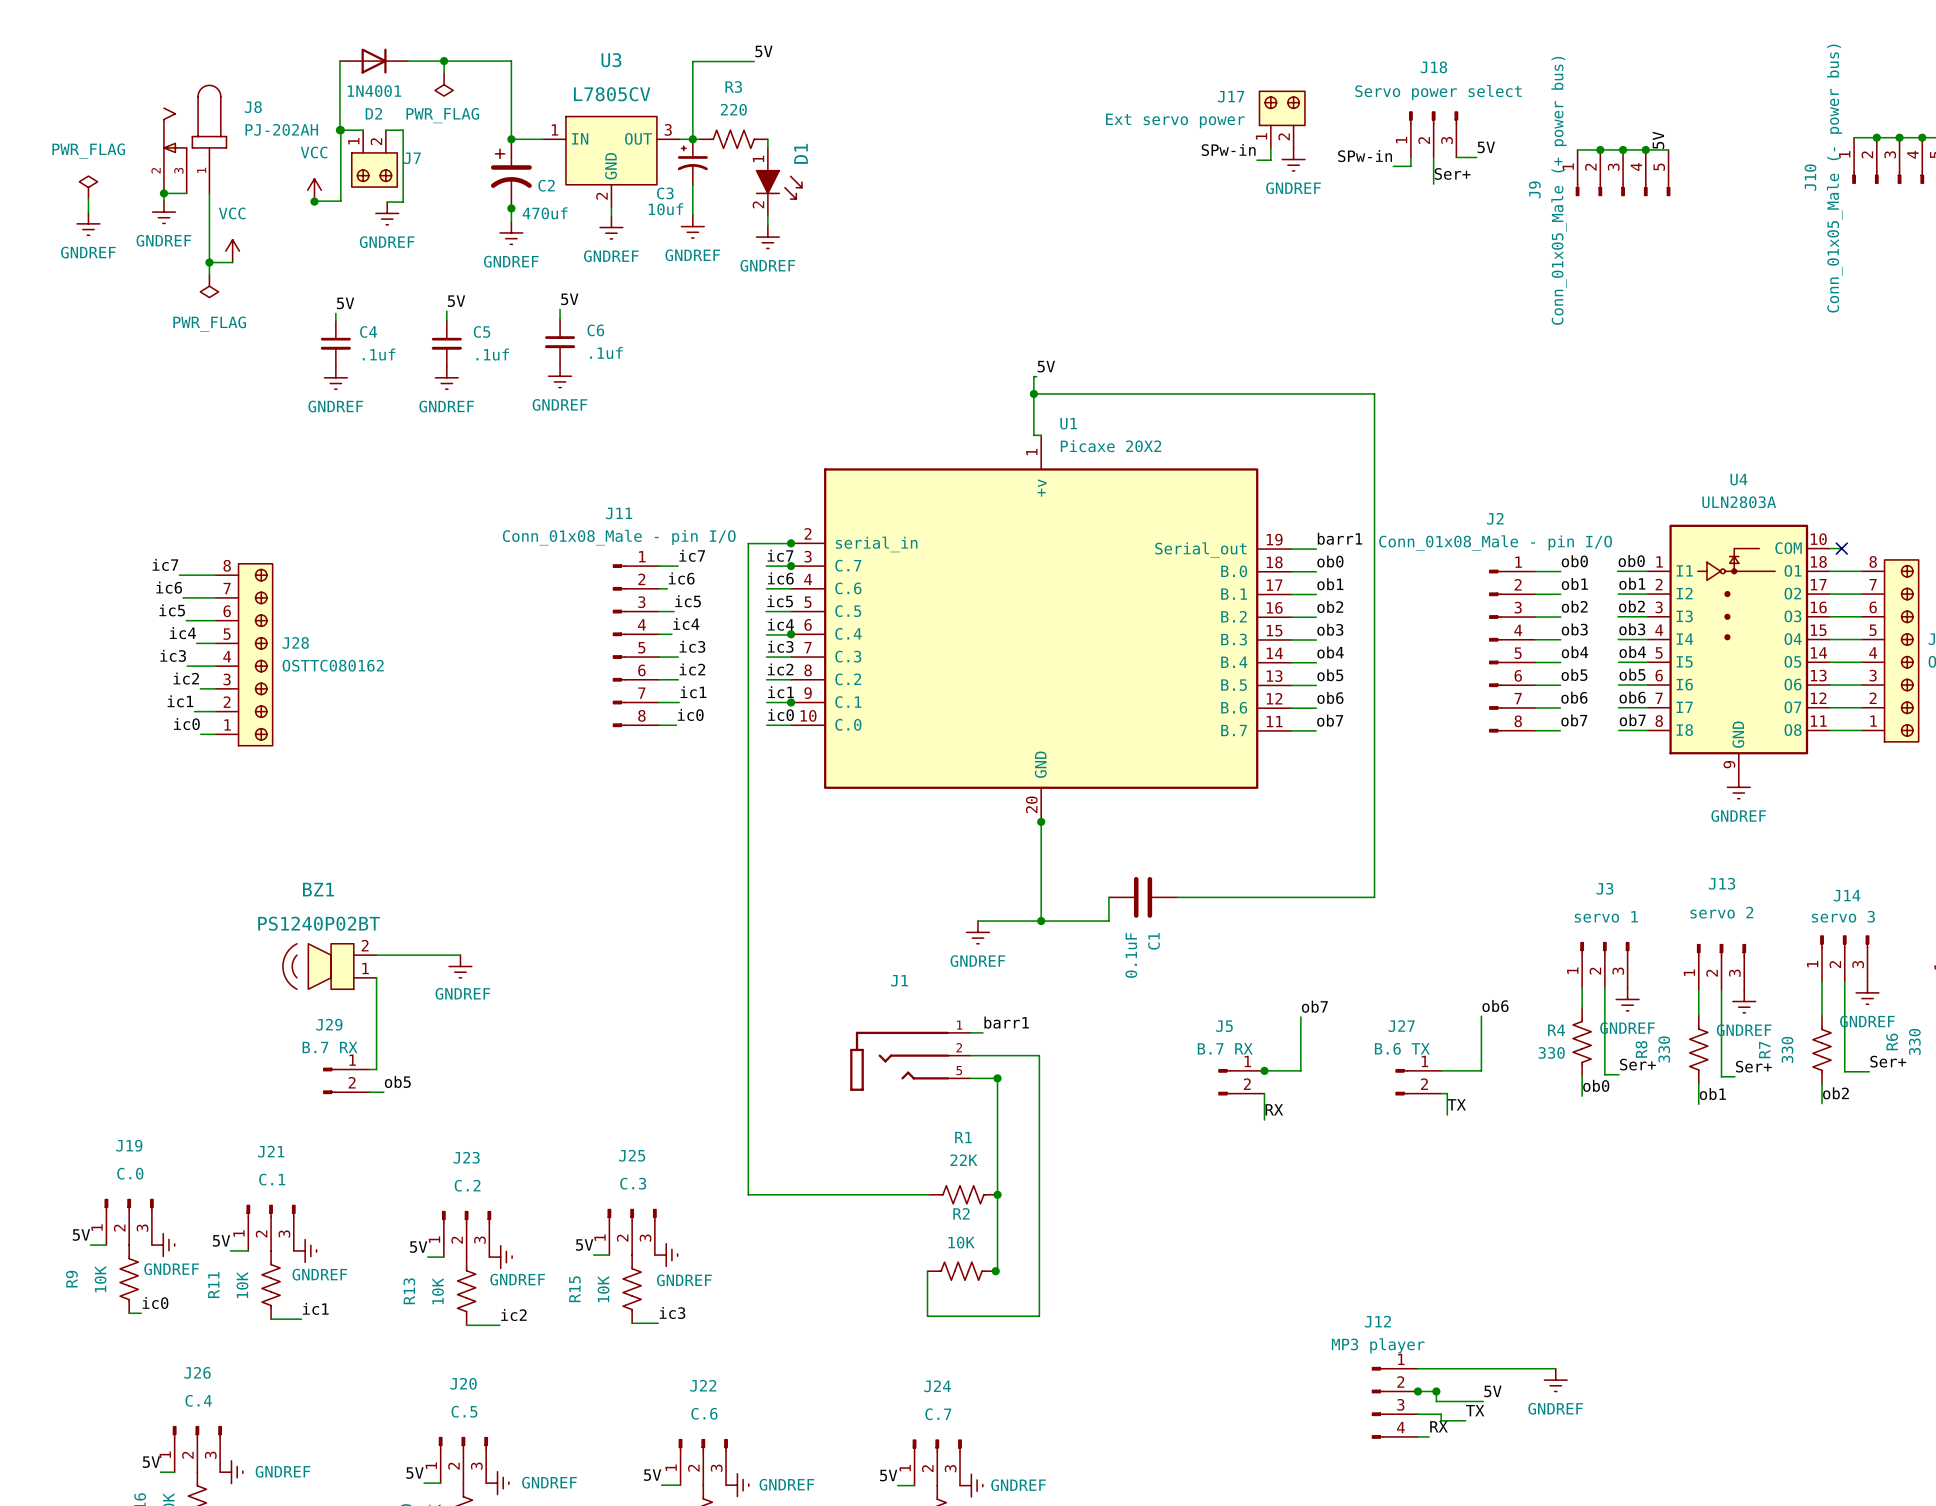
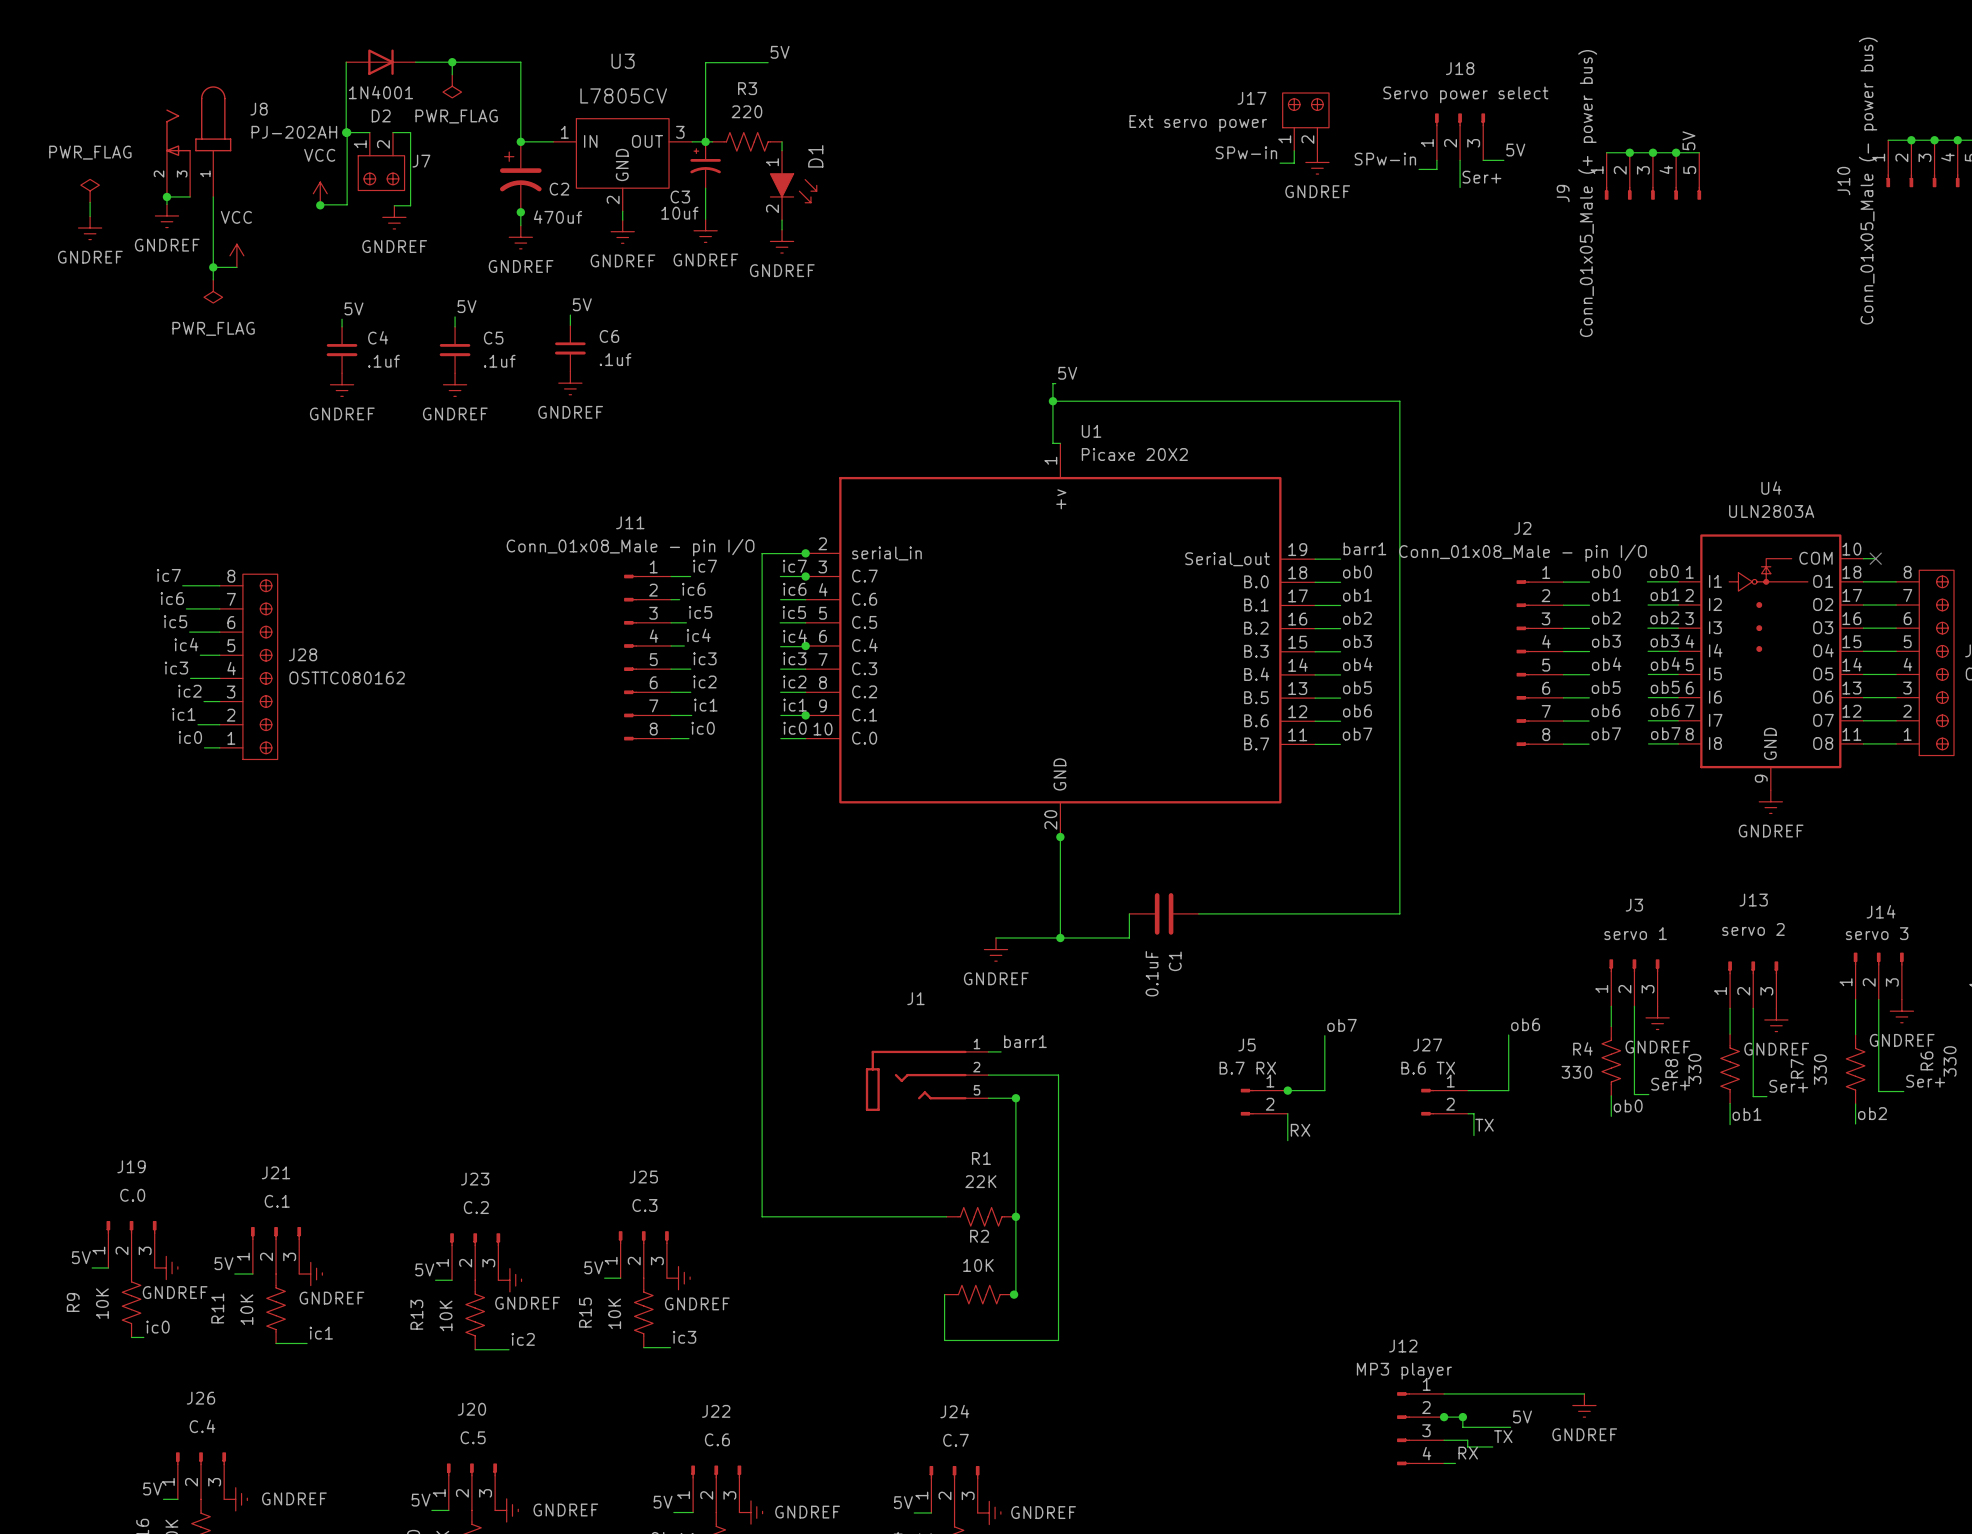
wire: (376, 955) (460, 955) -> none
BZ1: PS1240P02BT (329, 966) -> none
power symbol: GNDREF (460, 966) -> none
wire: (376, 977) (376, 1069) (369, 1069) -> none
J29: B.7 RX (346, 1080) -> none
label: ob5 (397, 1081) -> none
wire: (369, 1092) (383, 1092) -> none

